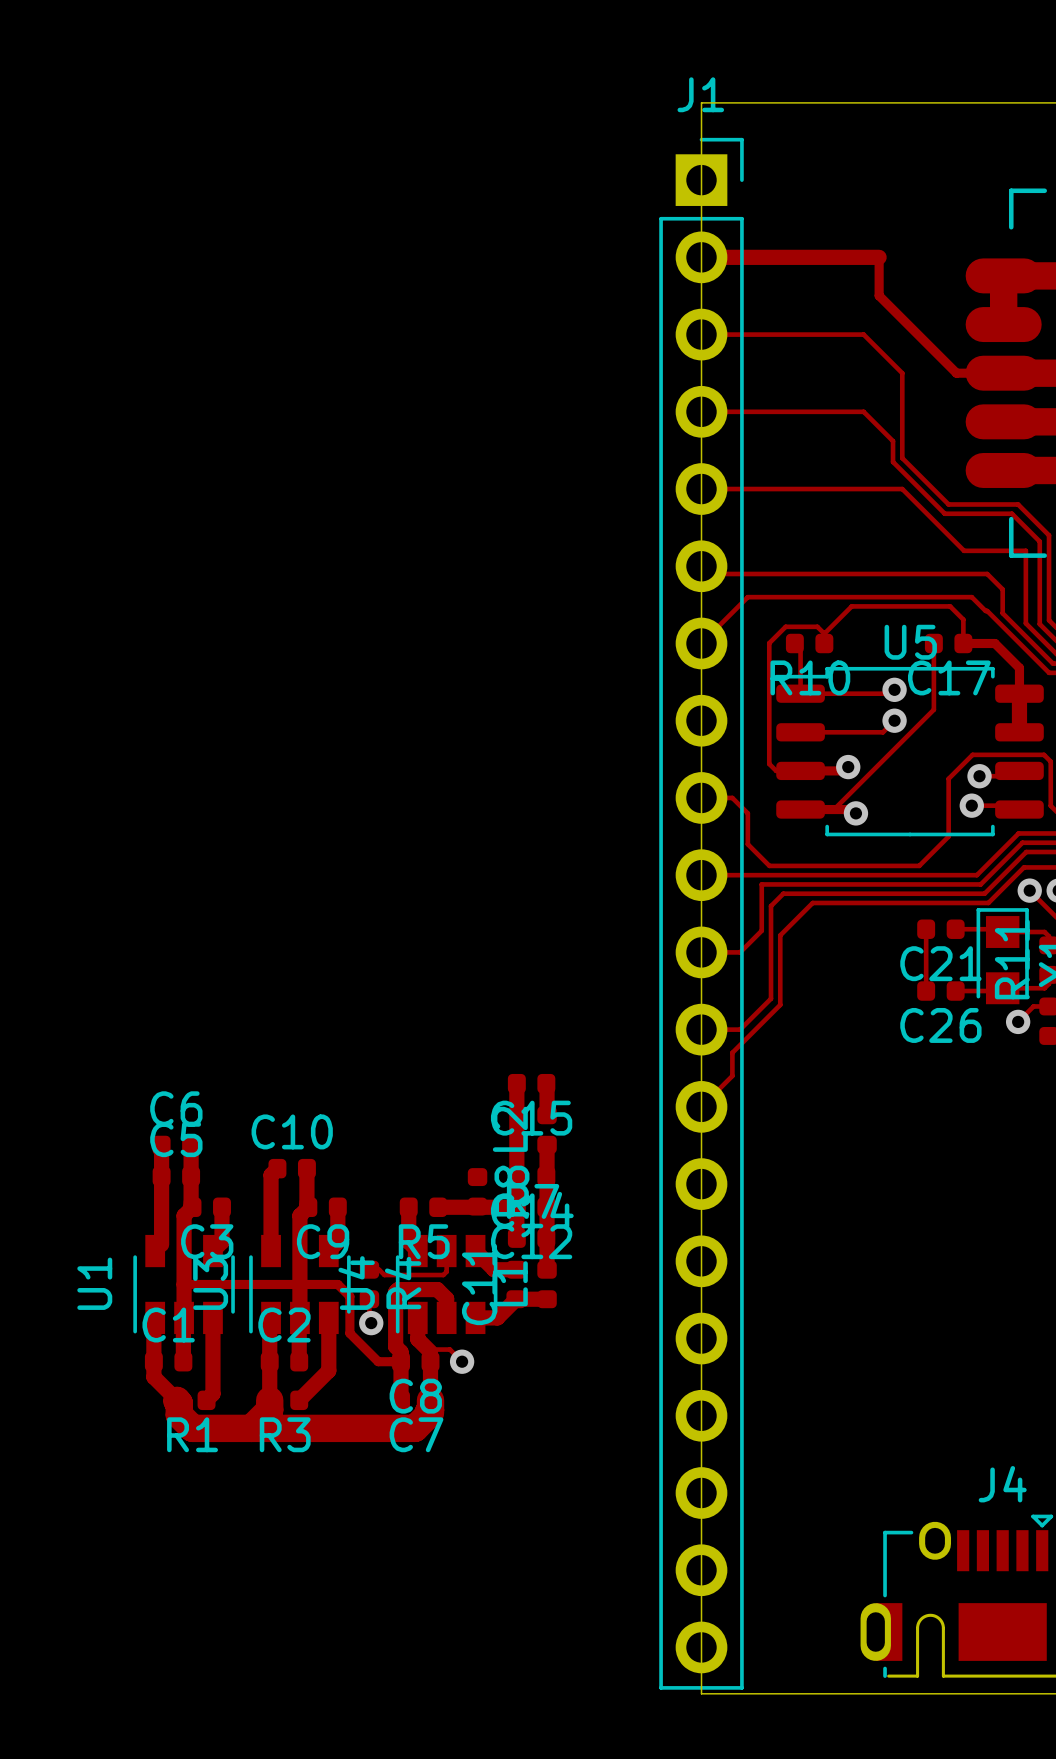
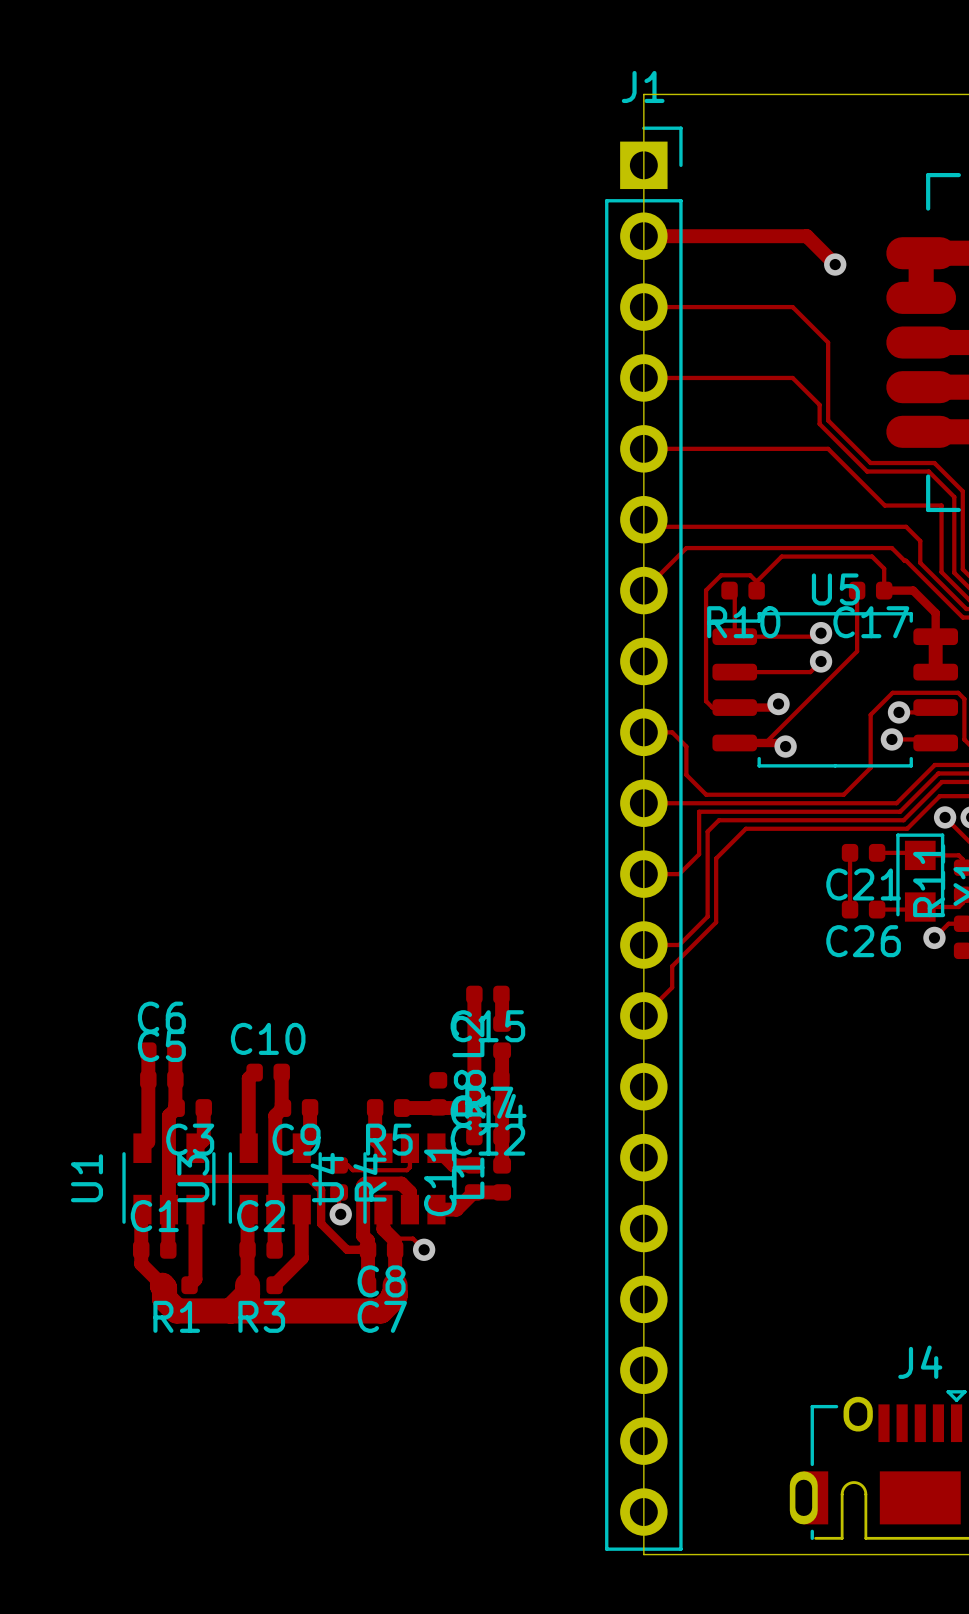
track: (879, 257) (879, 295) (956, 373) (1003, 373) -> (806, 236) (835, 264)
via: none -> (835, 264)

